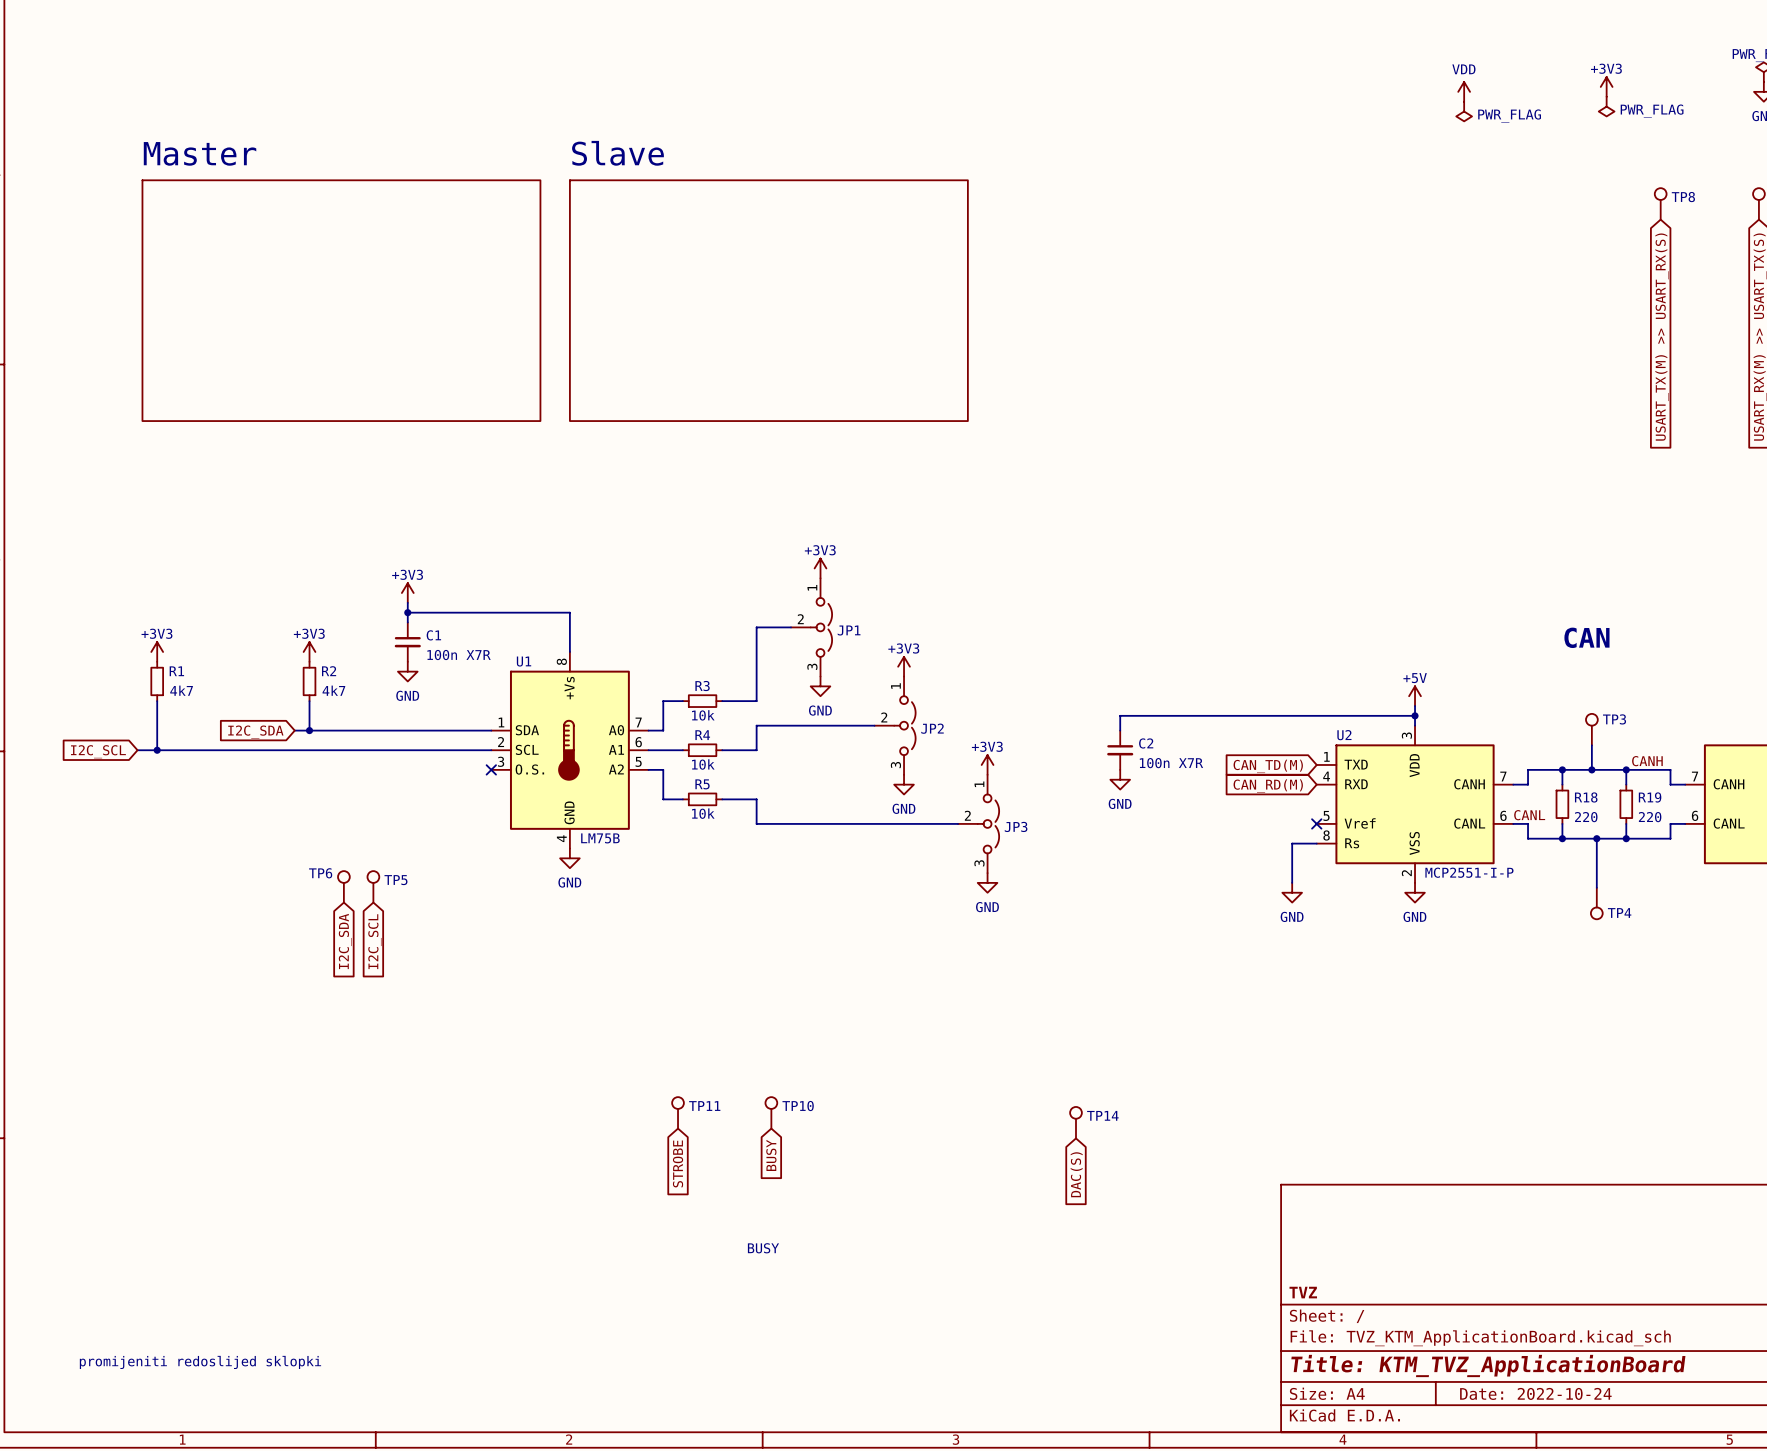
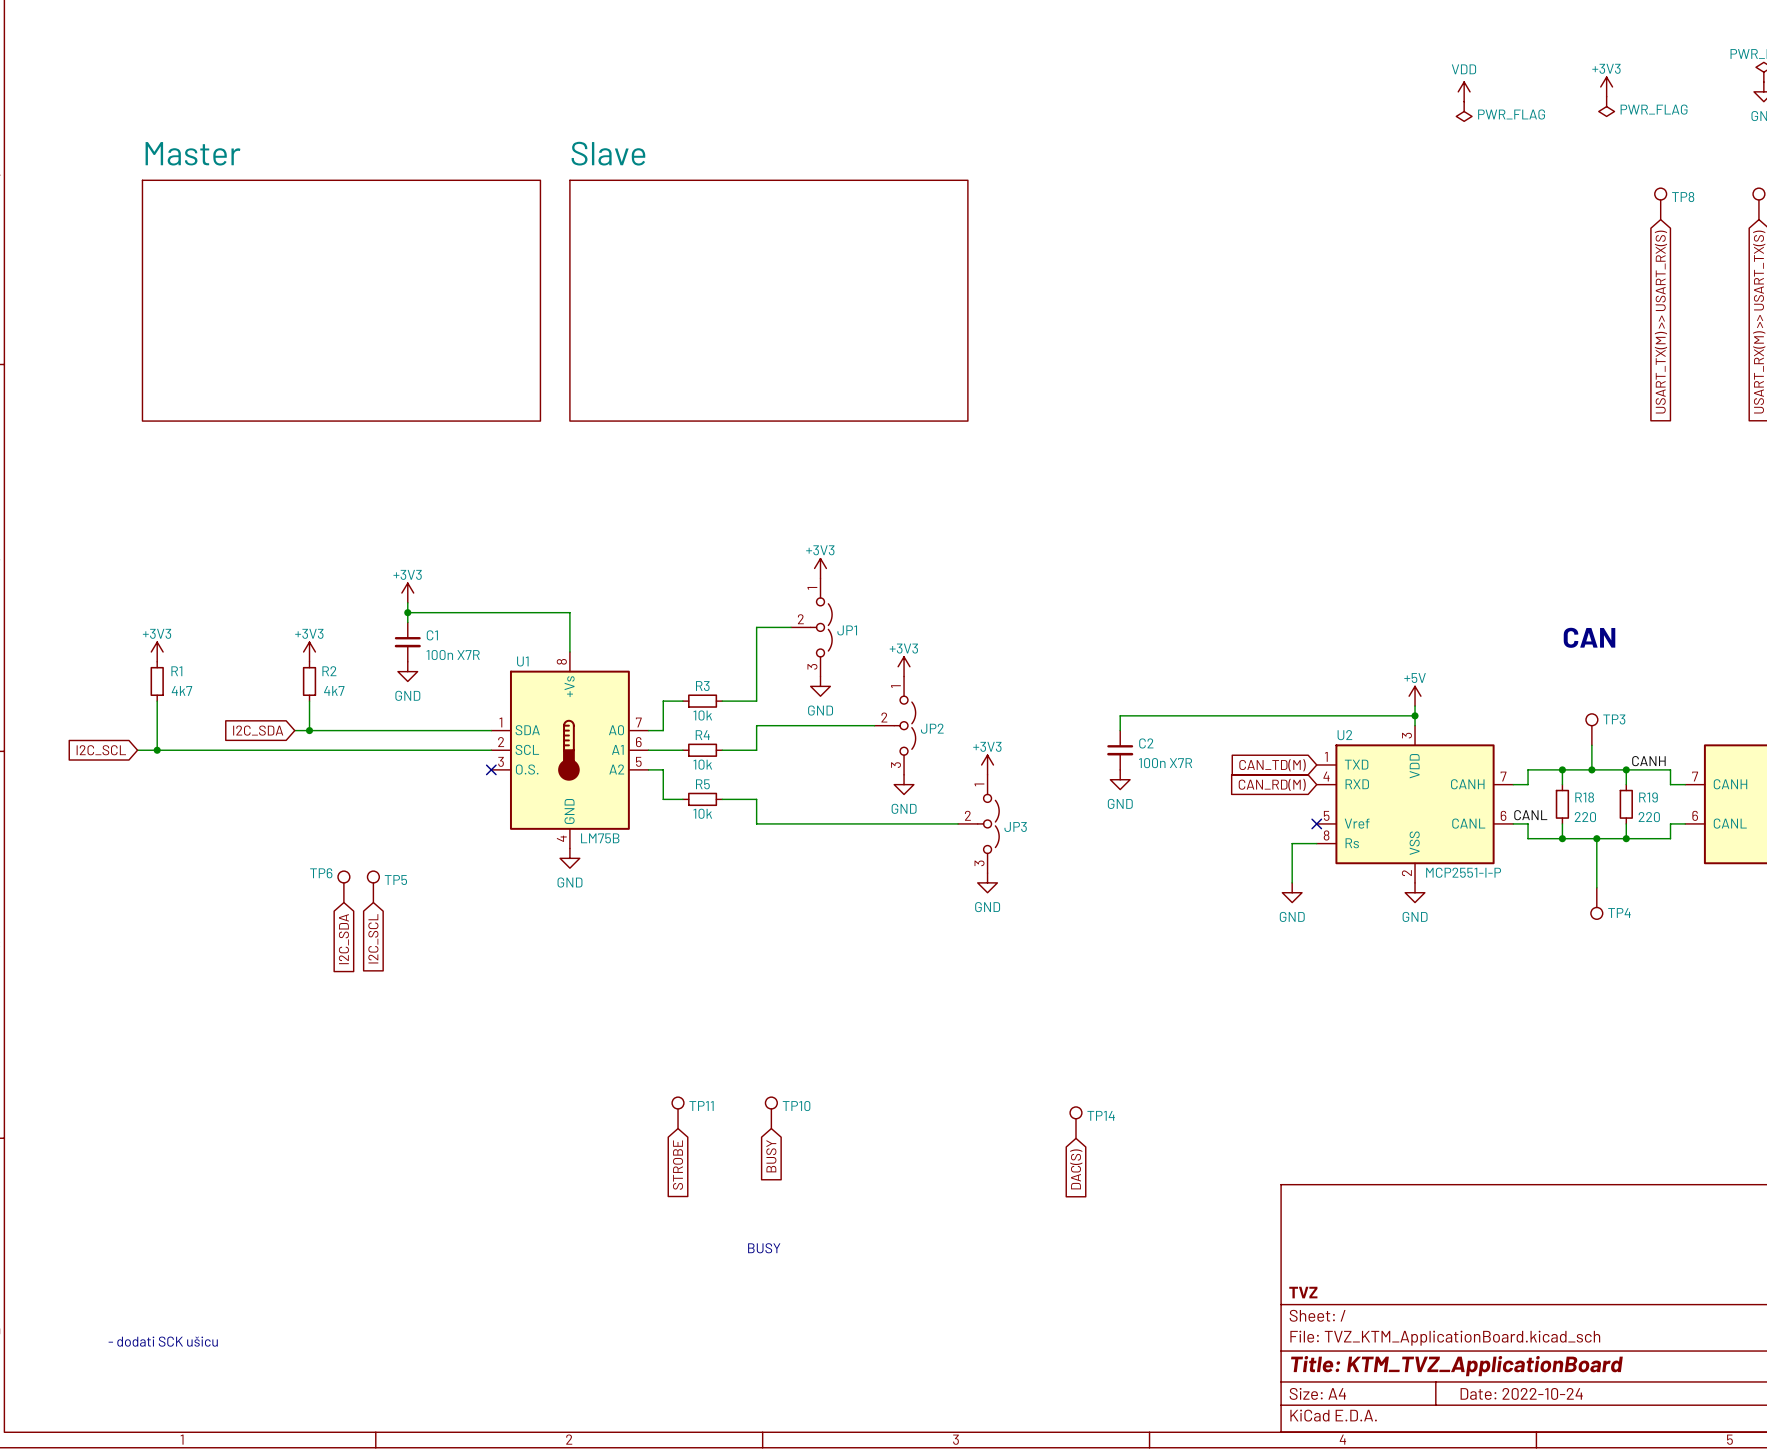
text: none -> - dodati SCK ušicu (163, 1341)
text: promijeniti redoslijed sklopki (200, 1362) -> none

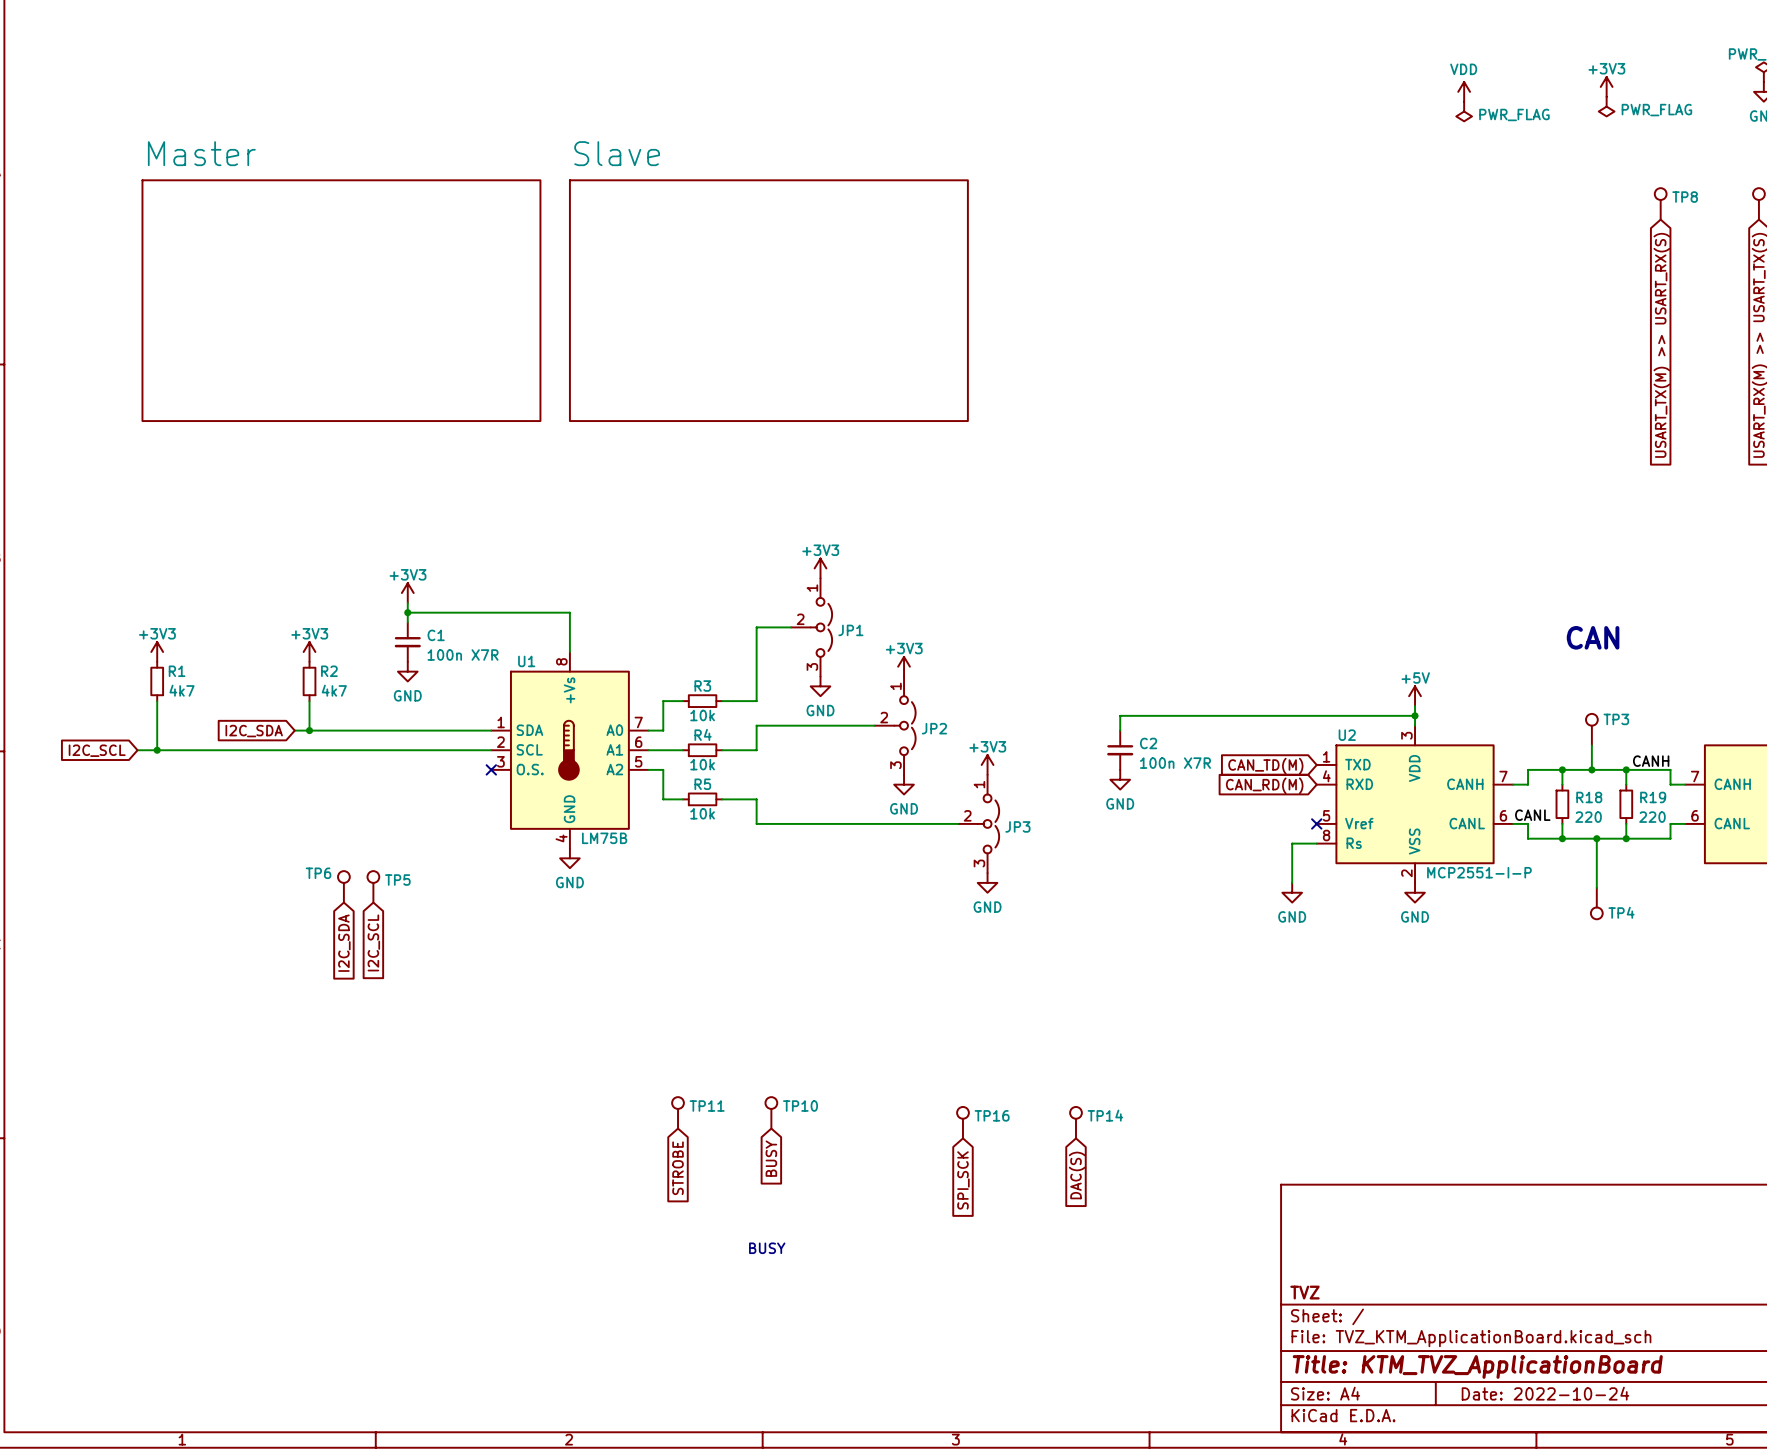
TP16: none -> (962, 1122)
global label: none -> SPI_SCK (963, 1180)
text: - dodati SCK ušicu (163, 1341) -> none

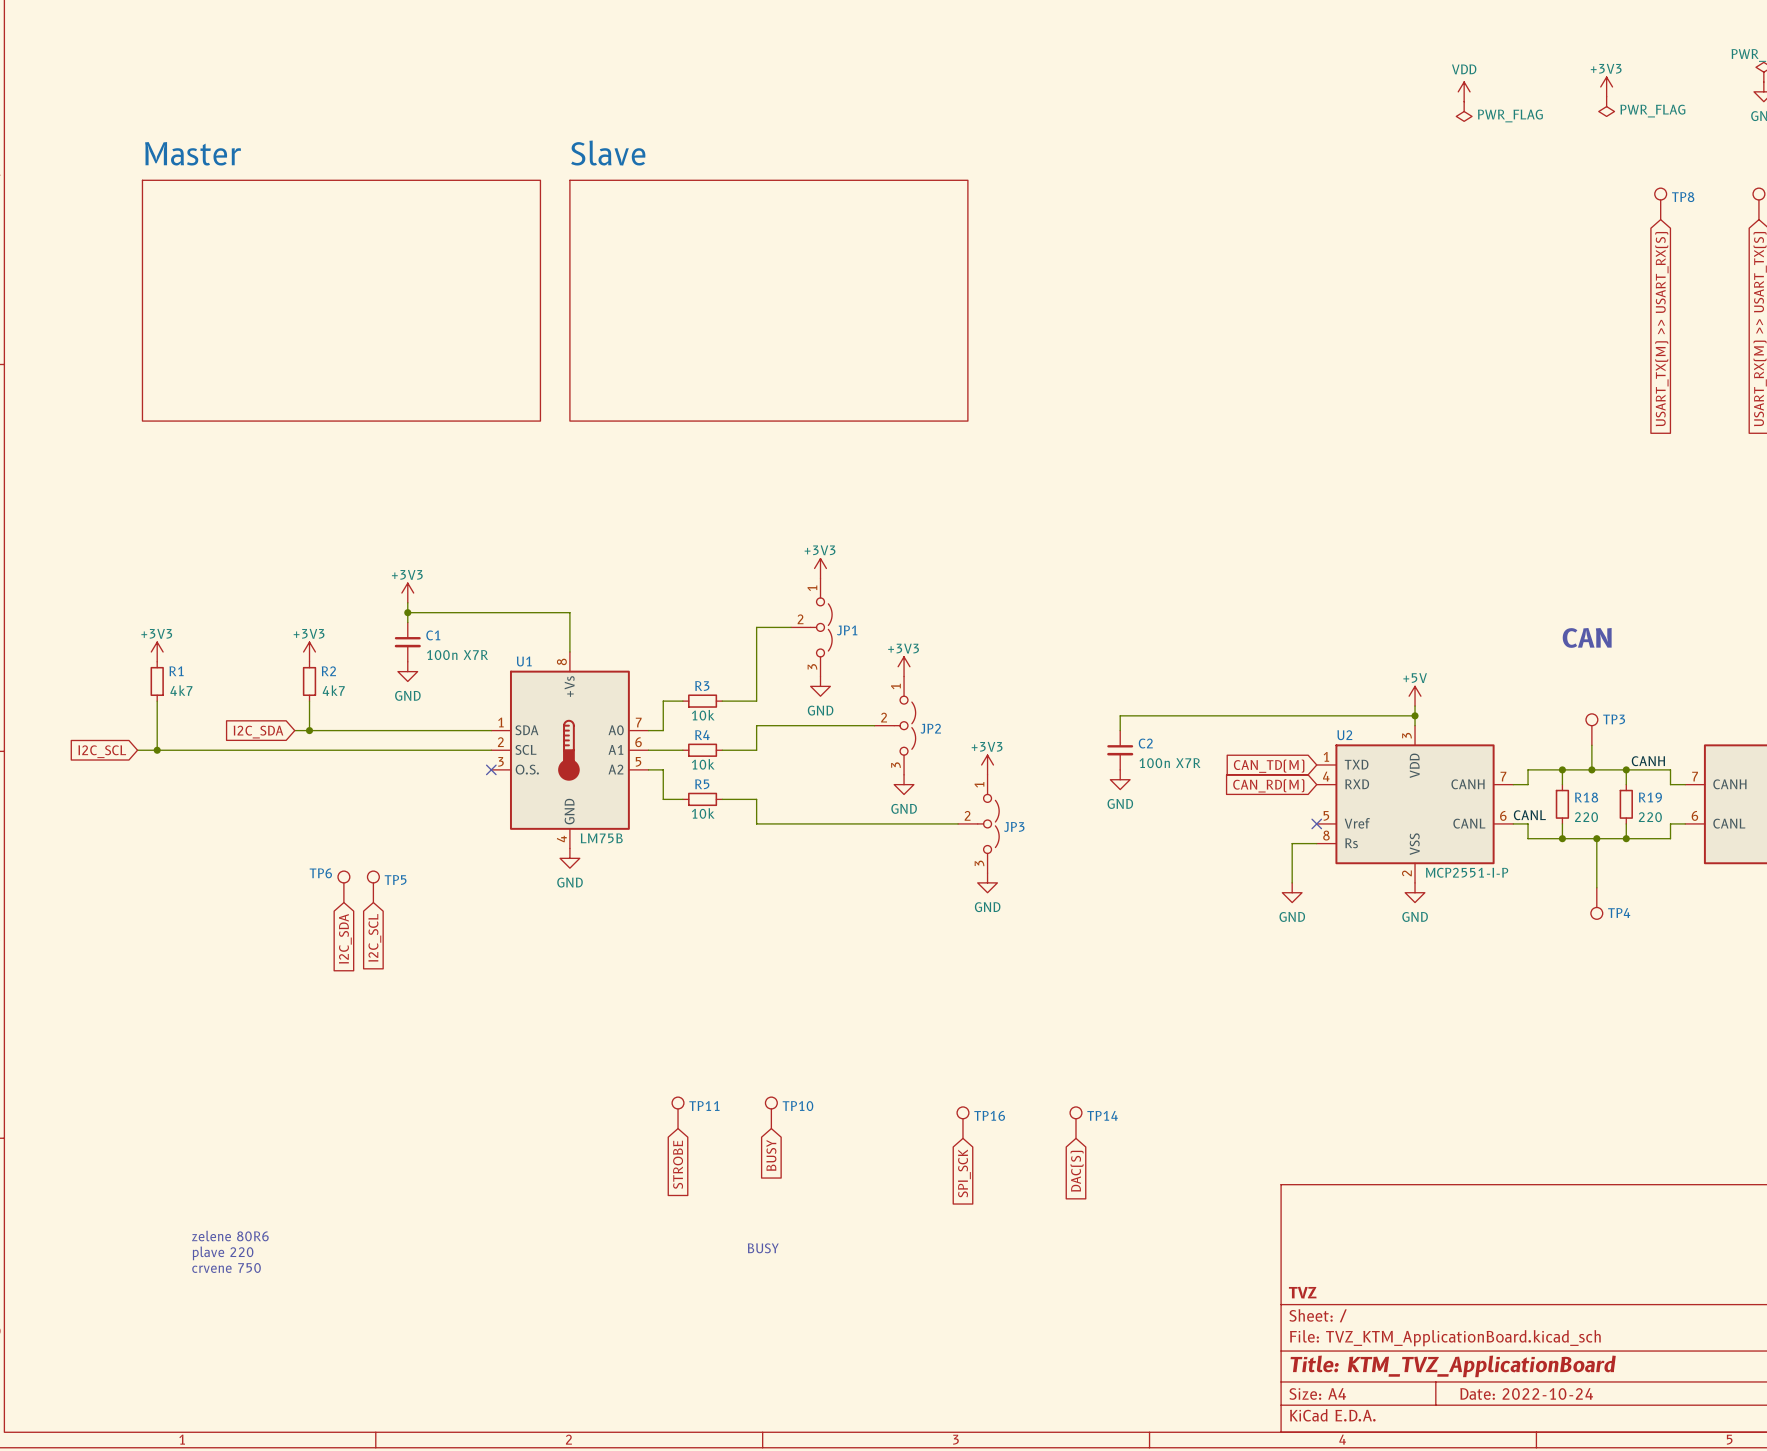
text: none -> zelene 80R6 (230, 1236)
text: none -> plave 220 (223, 1253)
text: none -> crvene 750 (226, 1268)

